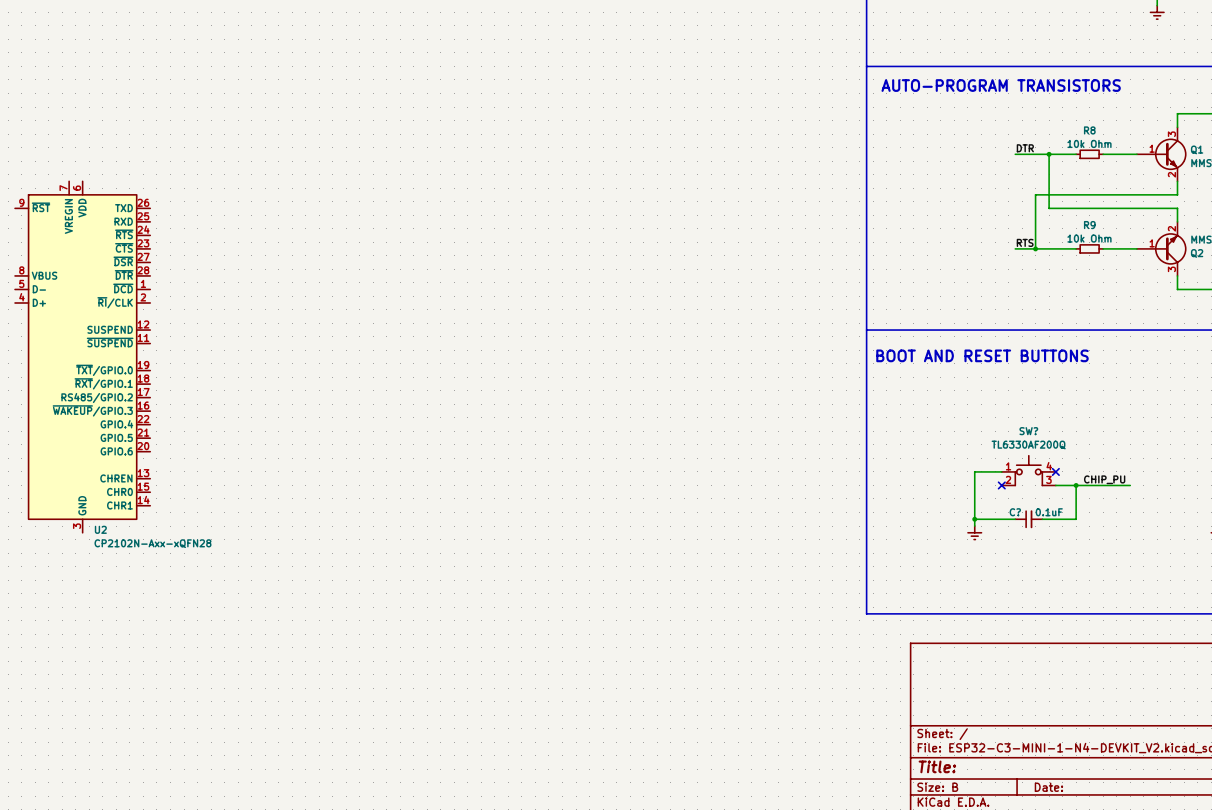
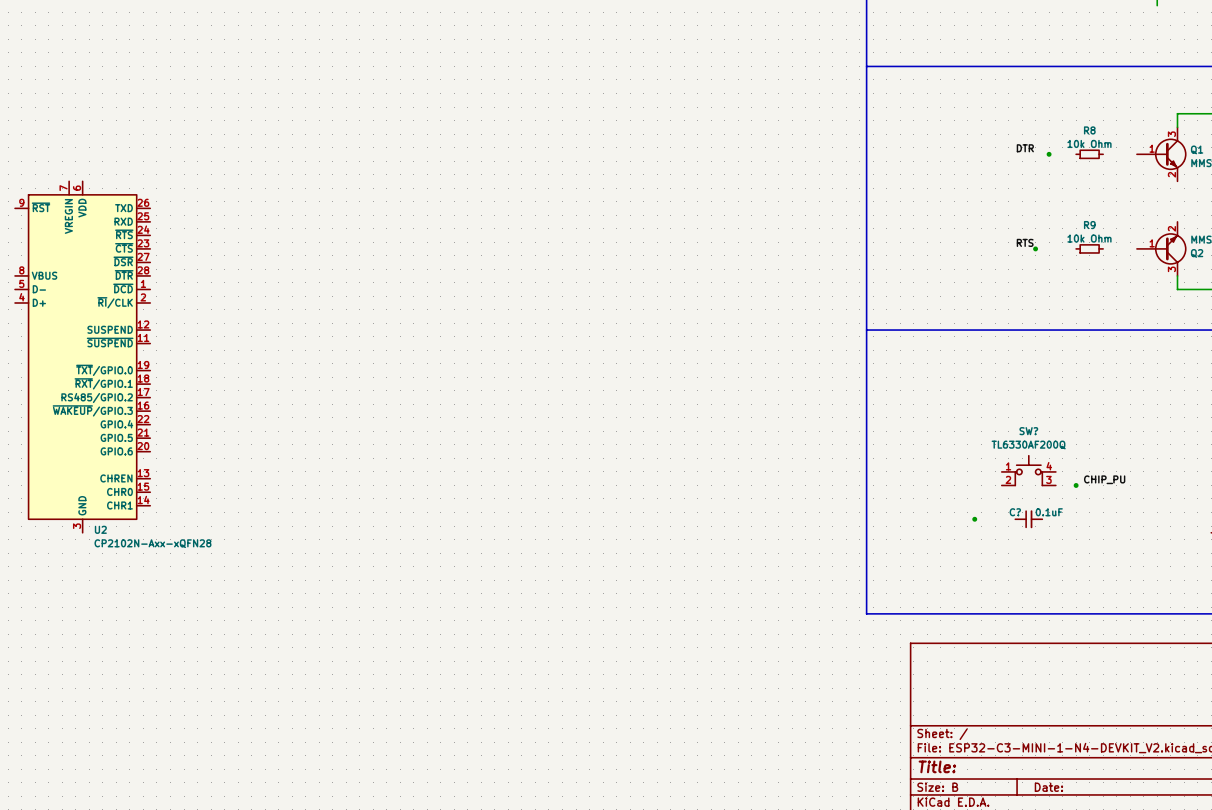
power symbol: (1157, 12) -> none
text: AUTO-PROGRAM TRANSISTORS (1001, 85) -> none
wire: (1015, 154) (1076, 154) -> none
wire: (1049, 154) (1049, 208) (1177, 208) (1177, 221) -> none
wire: (1103, 154) (1136, 154) -> none
wire: (1177, 181) (1177, 194) (1035, 194) (1035, 248) -> none
wire: (1015, 248) (1076, 248) -> none
wire: (1103, 248) (1136, 248) -> none
text: BOOT AND RESET BUTTONS (982, 355) -> none
wire: (1001, 471) (974, 471) (974, 526) -> none
no-connect mark: (1055, 471) -> none
no-connect mark: (1001, 485) -> none
wire: (1055, 485) (1130, 485) -> none
wire: (1076, 485) (1076, 519) (1042, 519) -> none
wire: (974, 519) (1015, 519) -> none
power symbol: (974, 532) -> none

